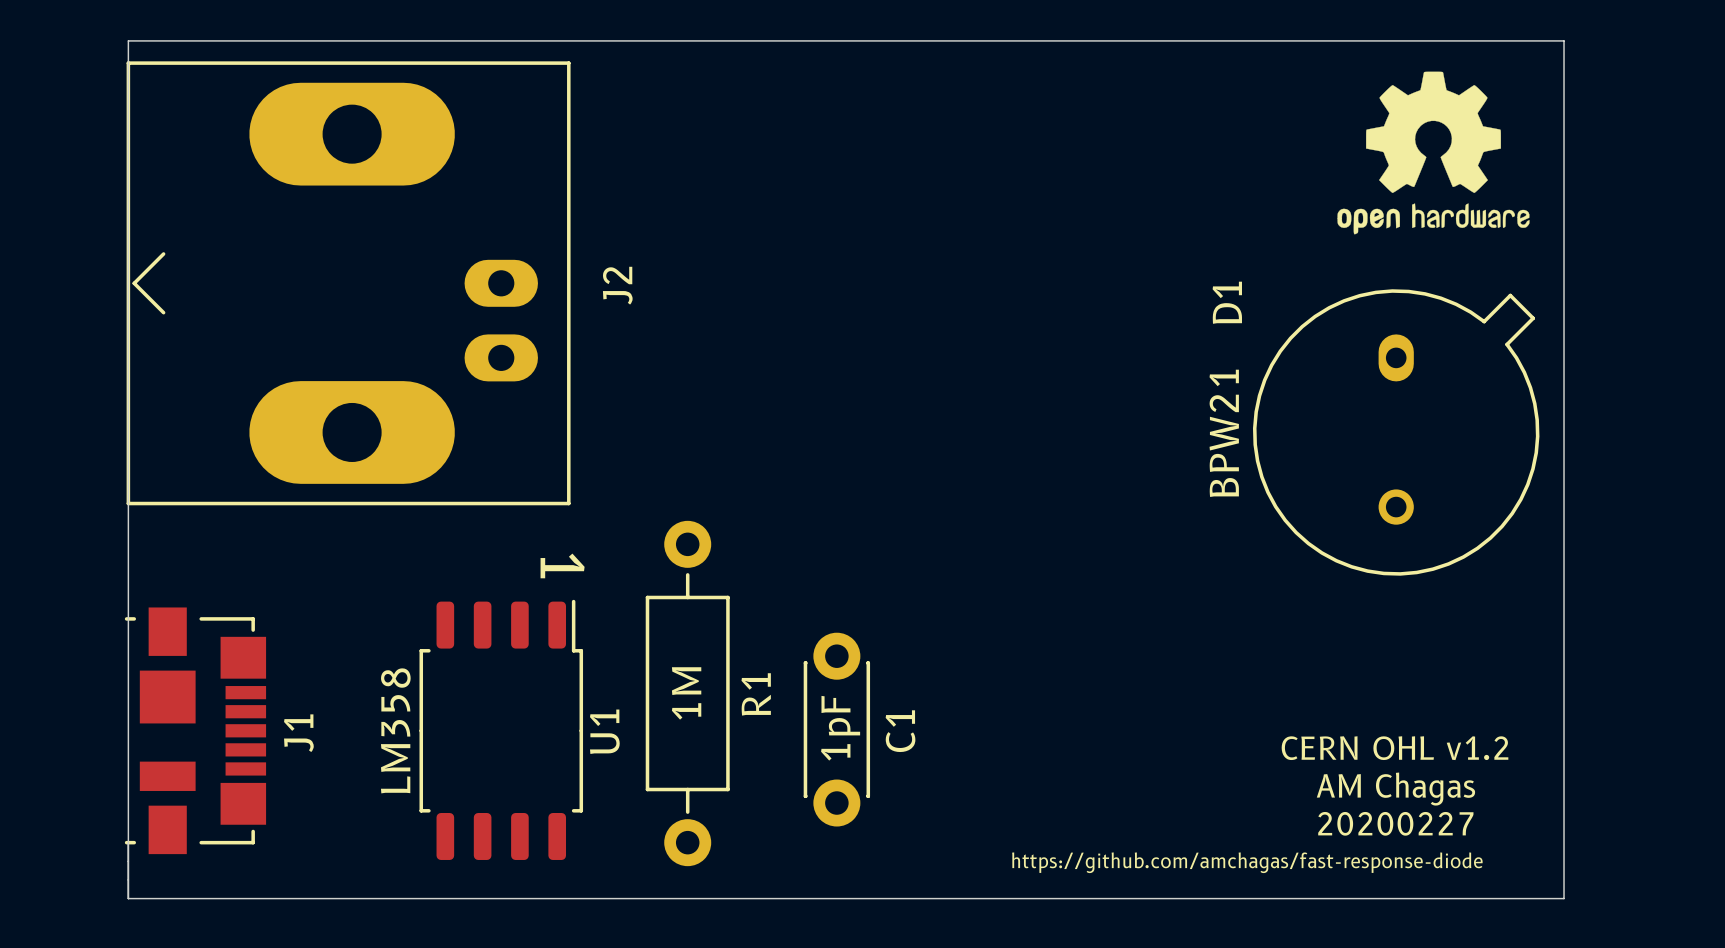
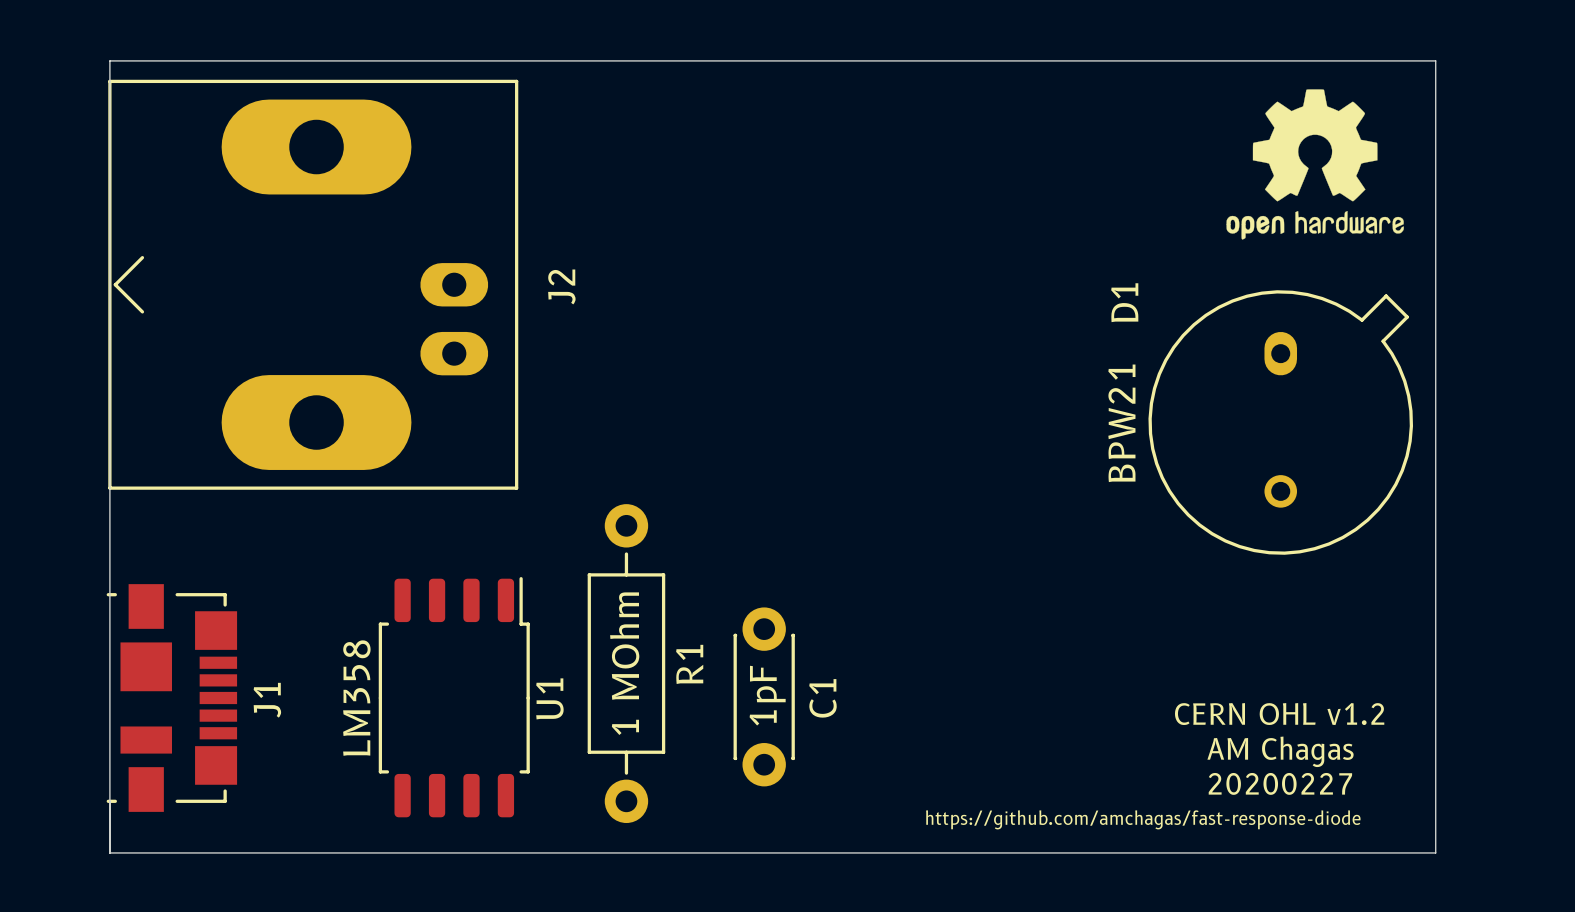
text: 1 (562, 565) -> none
R1 value: 1M (686, 693) -> 1 MOhm (624, 663)

